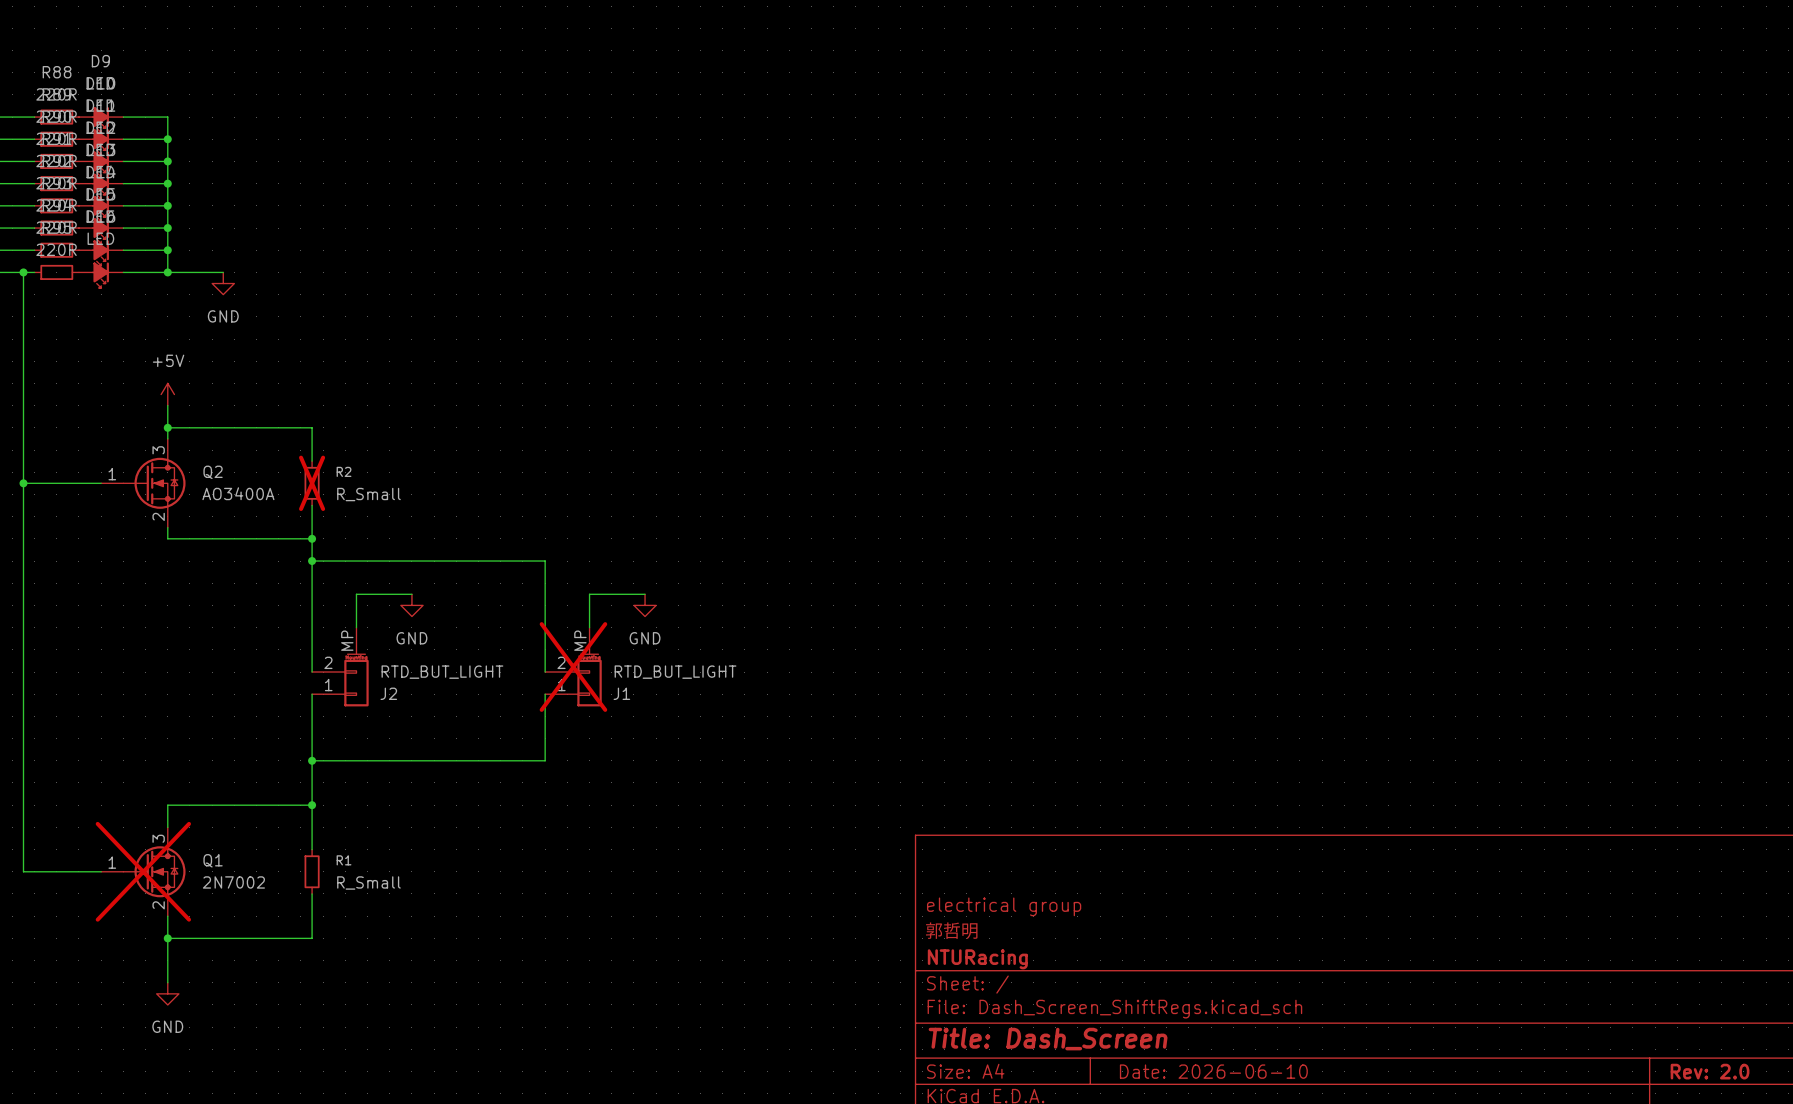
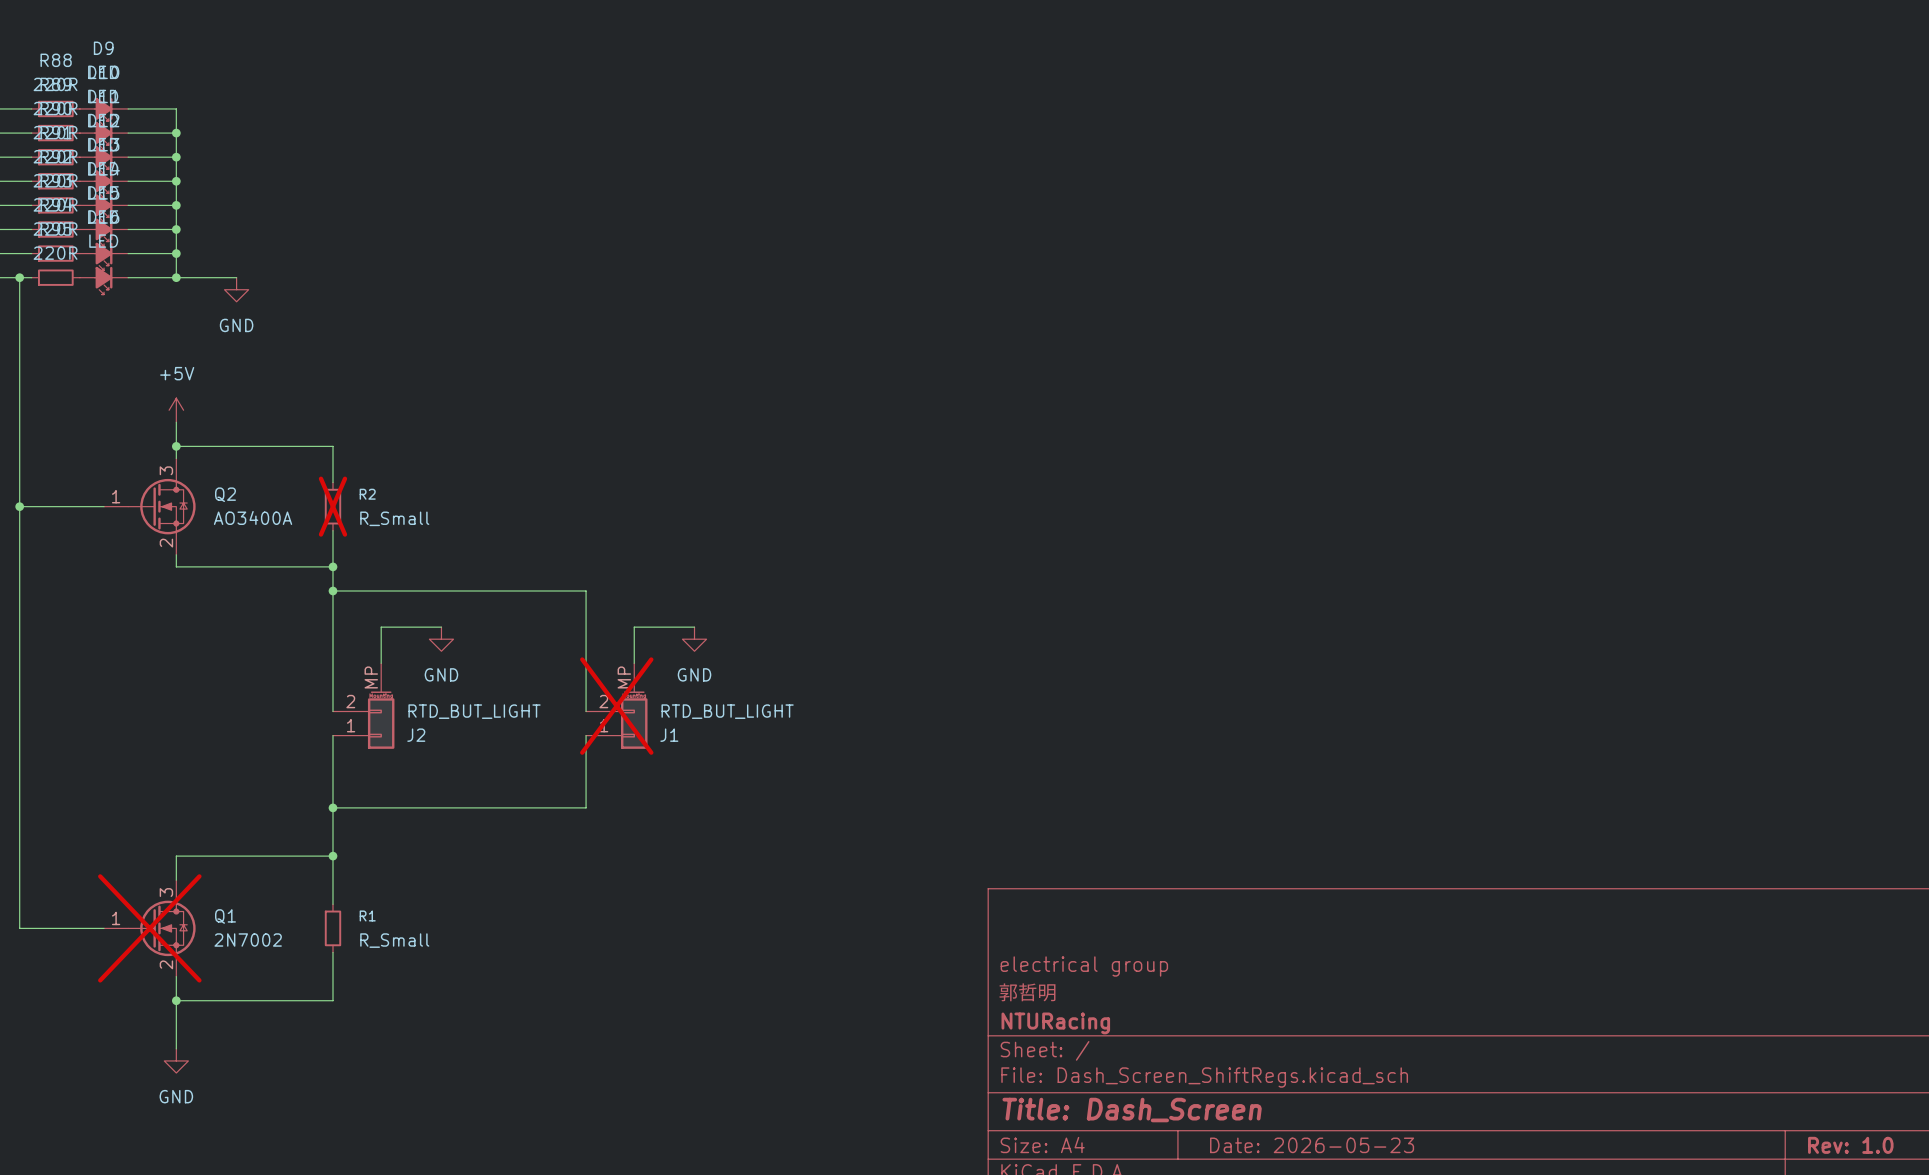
title block: Date: 2026-06-10 (1213, 1071) -> Date: 2026-05-23 (1312, 1145)
title block: Rev: 2.0 (1710, 1071) -> Rev: 1.0 (1850, 1145)

